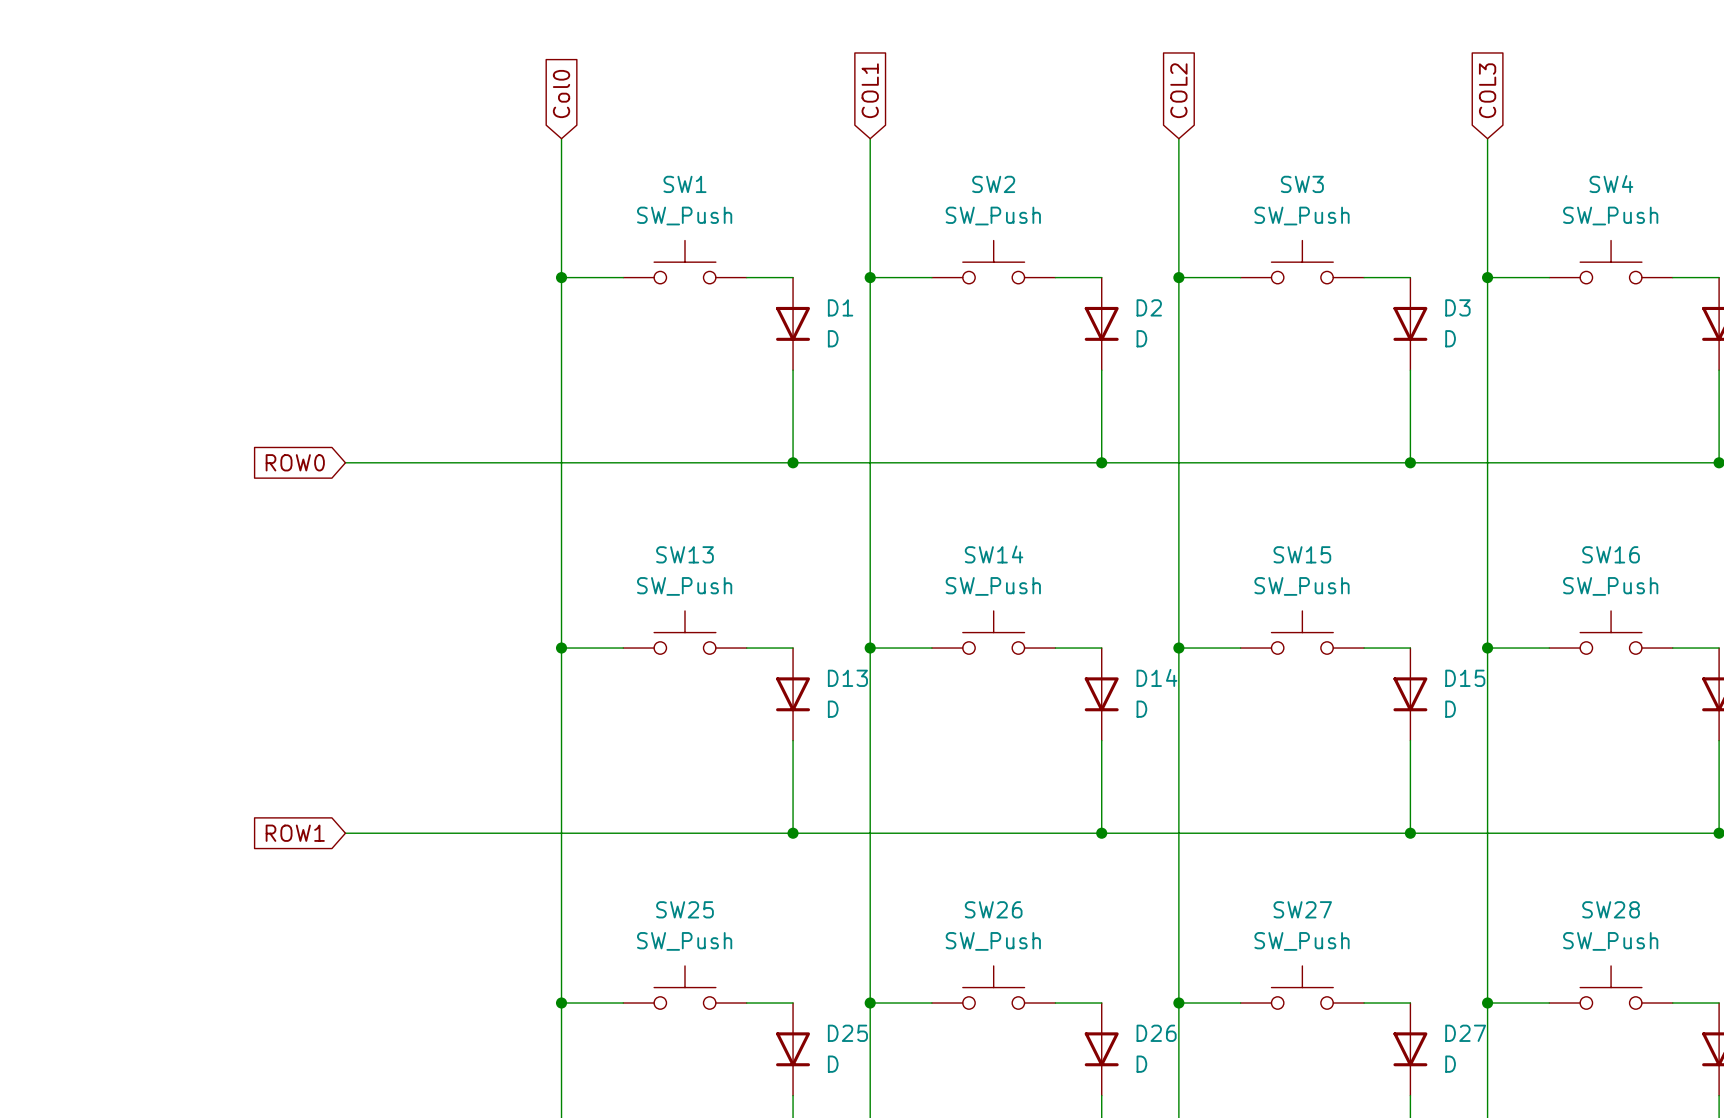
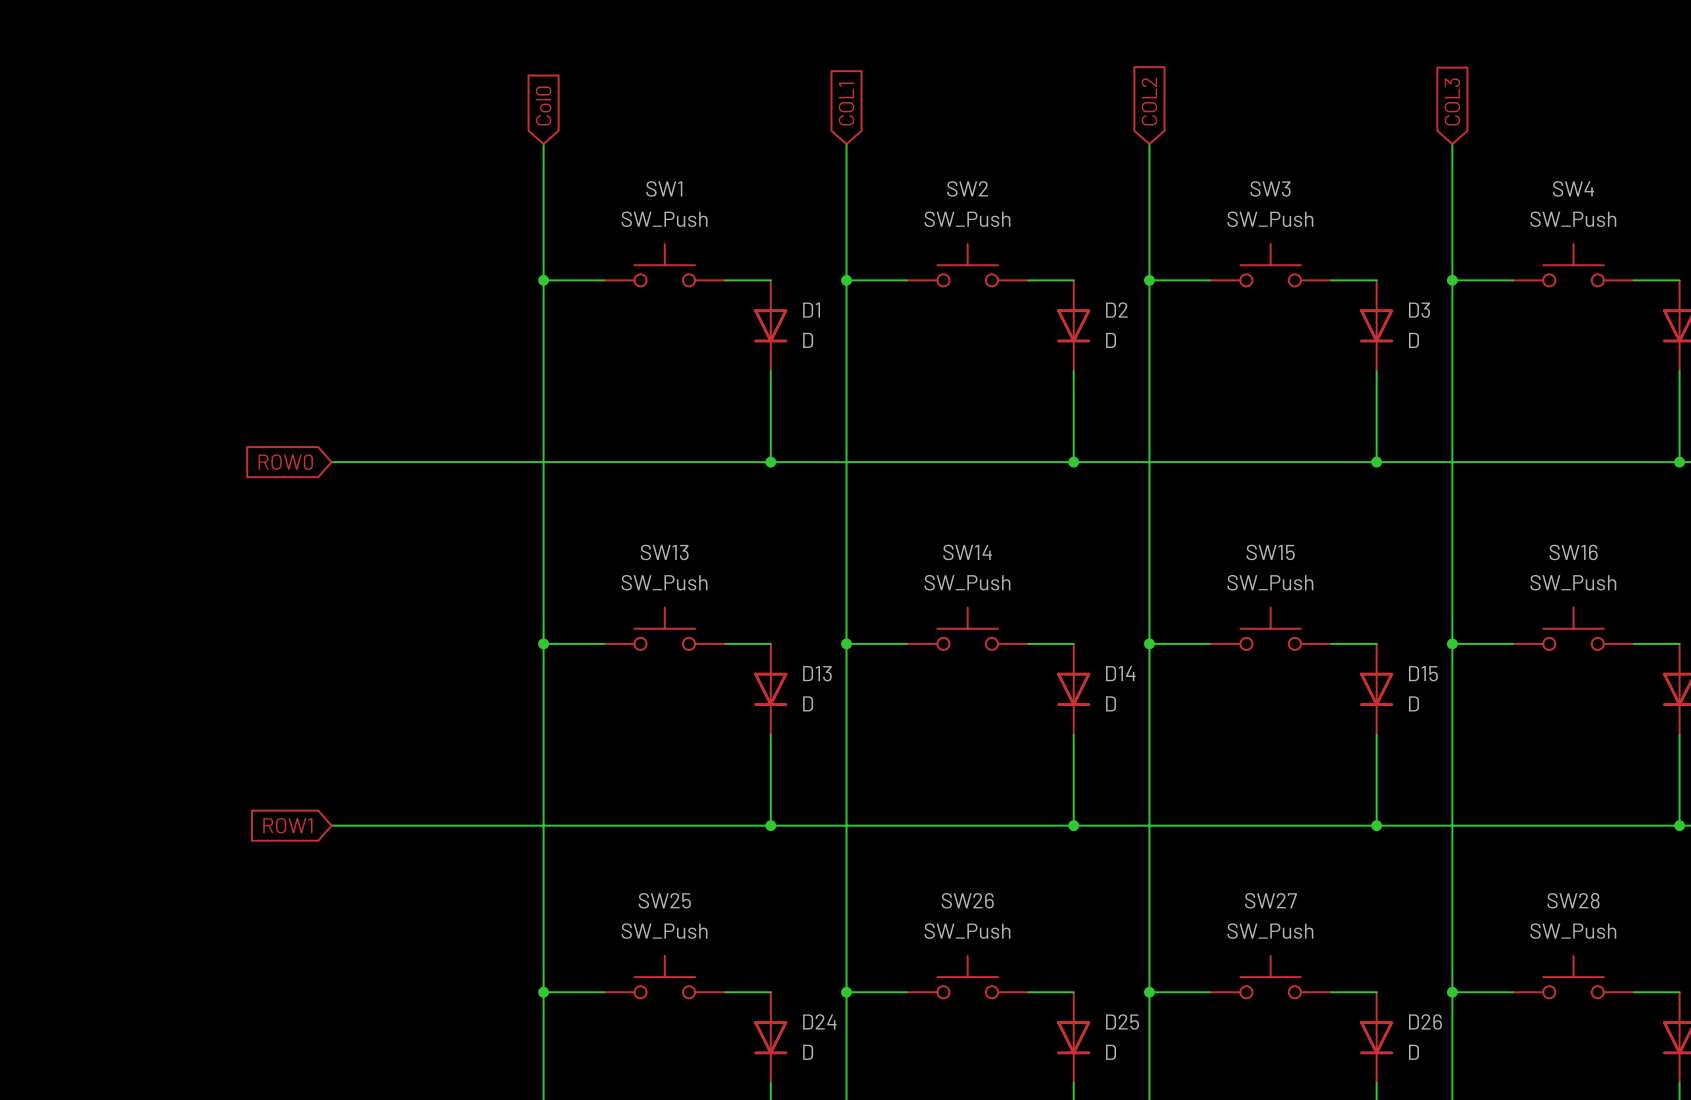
D25 name: D25 (847, 1033) -> D24 (819, 1021)
D26 name: D26 (1156, 1033) -> D25 (1122, 1021)
D27 name: D27 (1465, 1033) -> D26 (1425, 1021)

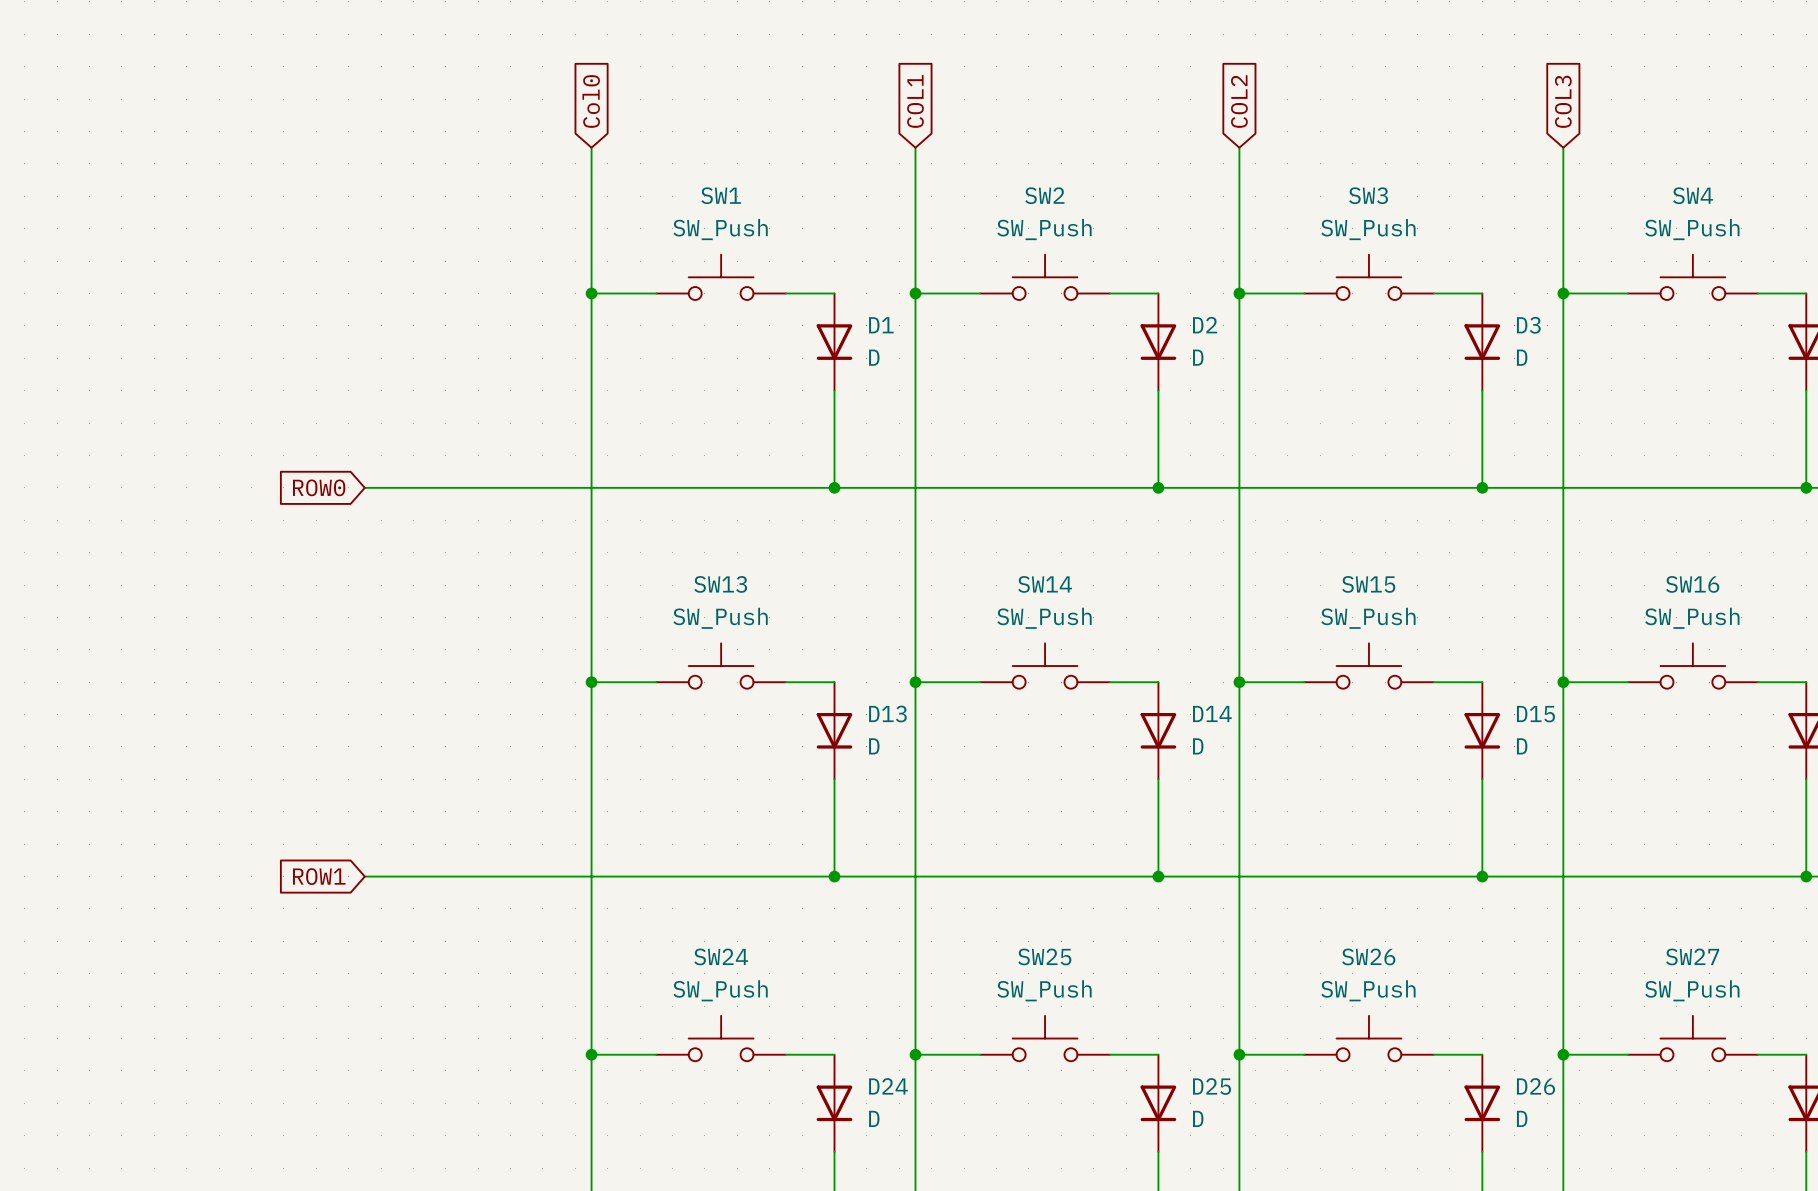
SW25 name: SW25 (664, 900) -> SW24 (721, 956)
SW26 name: SW26 (967, 900) -> SW25 (1044, 956)
SW27 name: SW27 (1270, 900) -> SW26 (1368, 956)
SW28 name: SW28 (1573, 900) -> SW27 (1692, 956)

